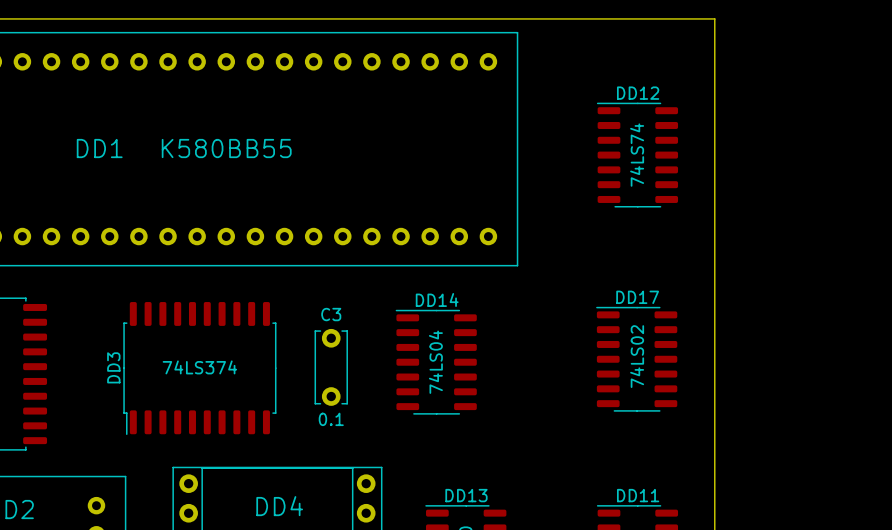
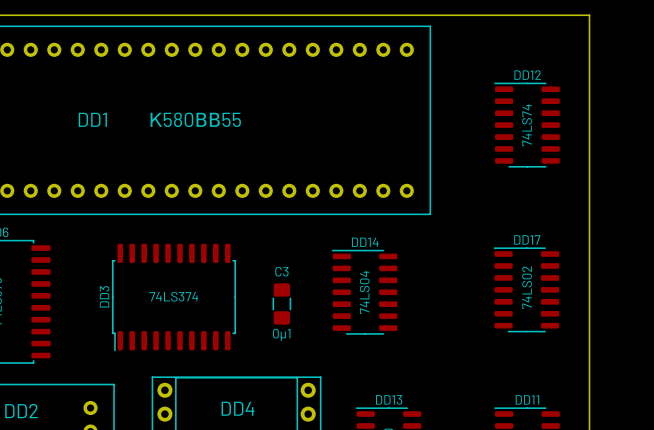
C3 footprint: [314, 328, 348, 406] -> [272, 283, 292, 325]
C3 value: 0.1 (331, 419) -> 0μ1 (281, 334)

